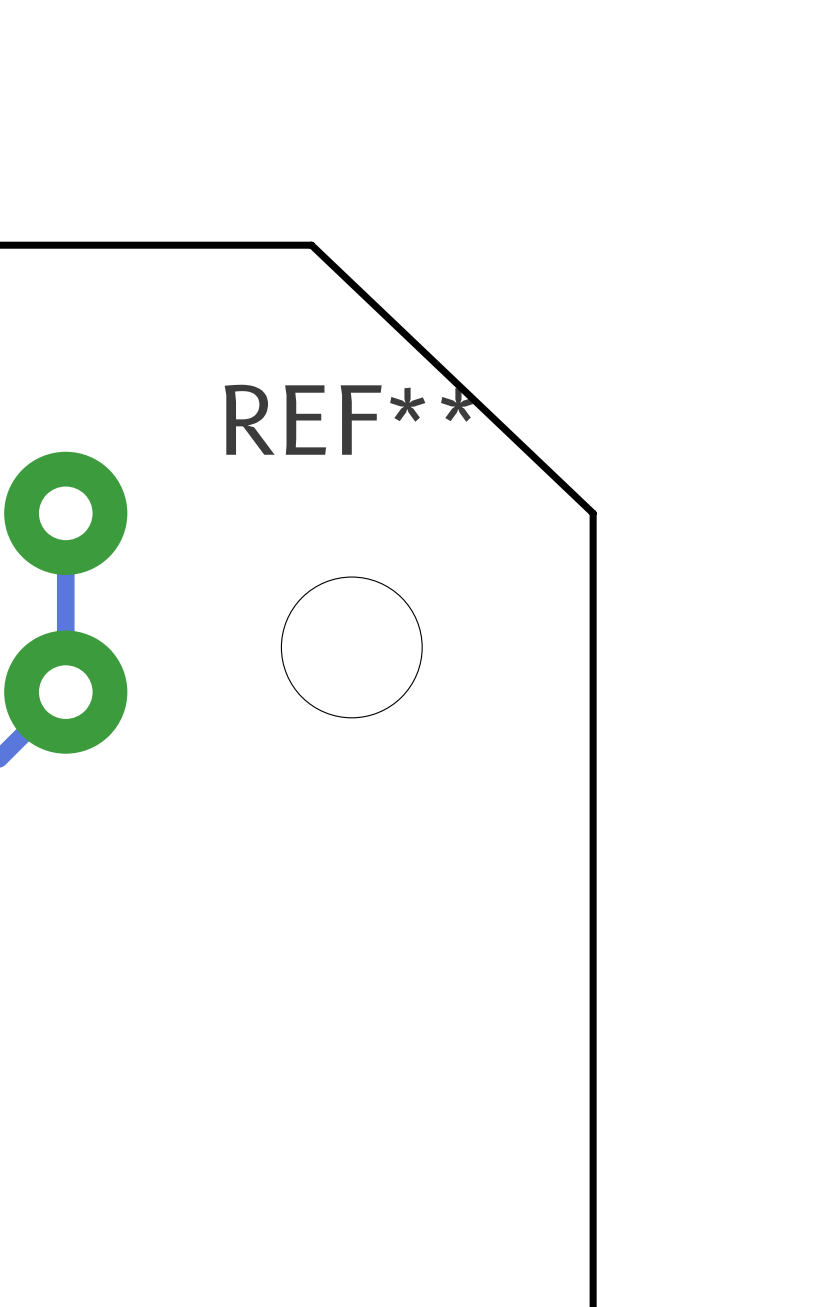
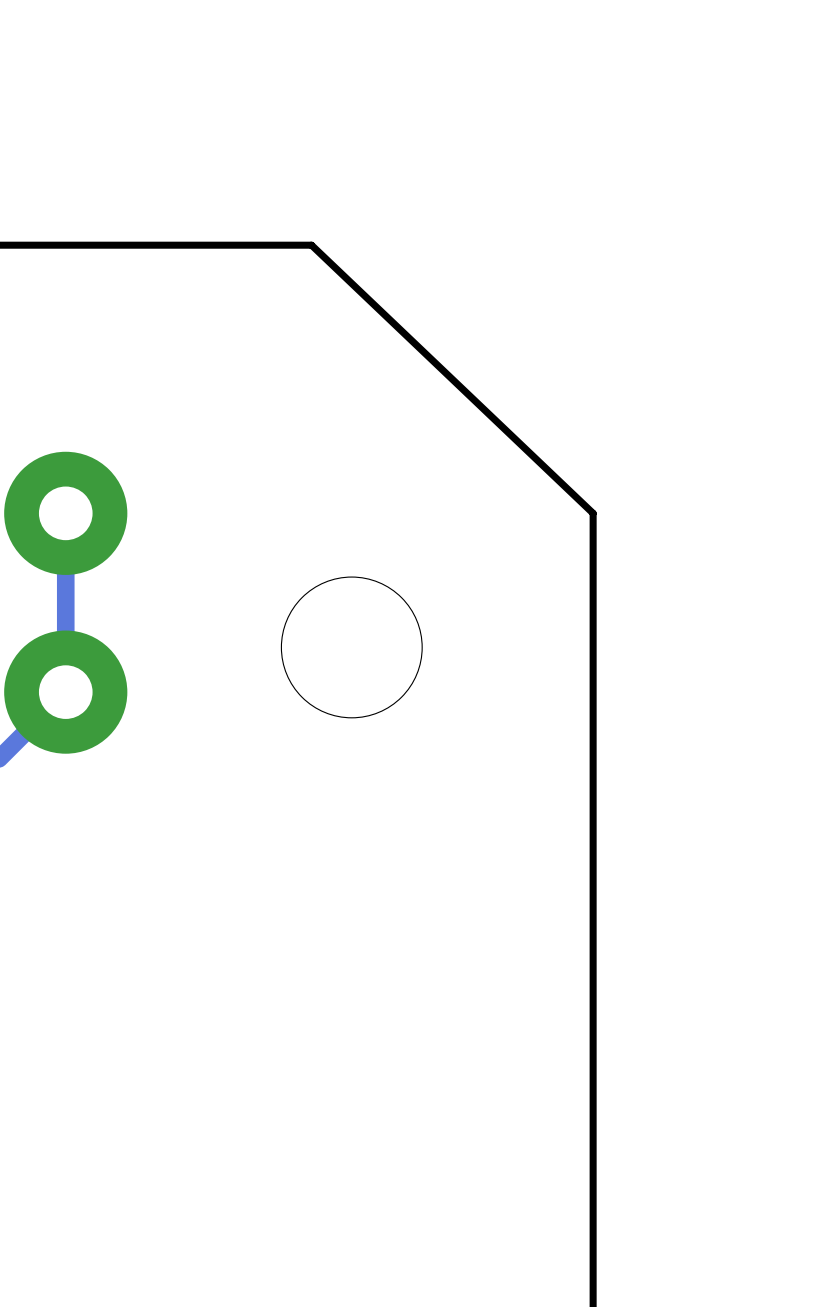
REF** name: REF** (350, 419) -> none

